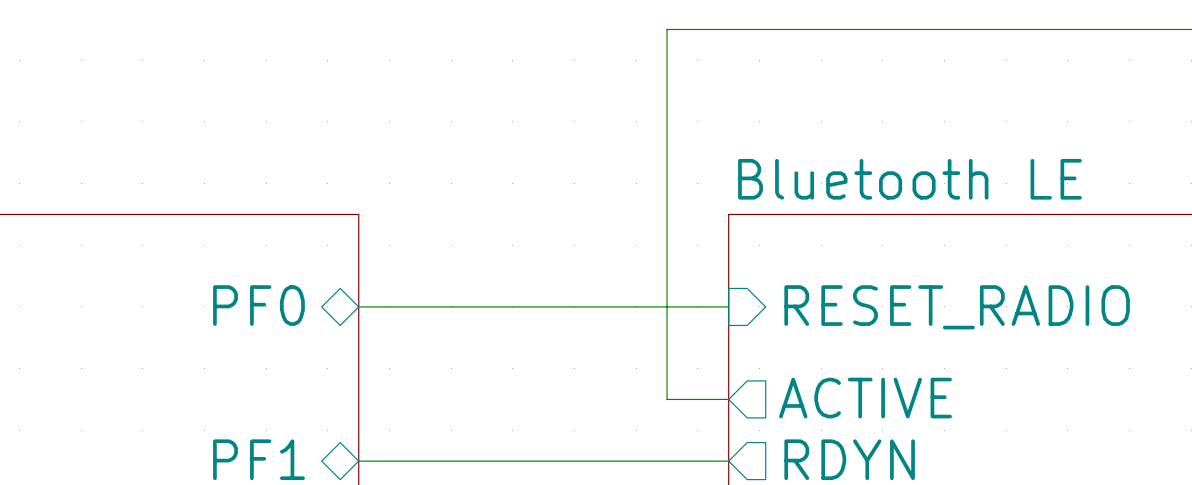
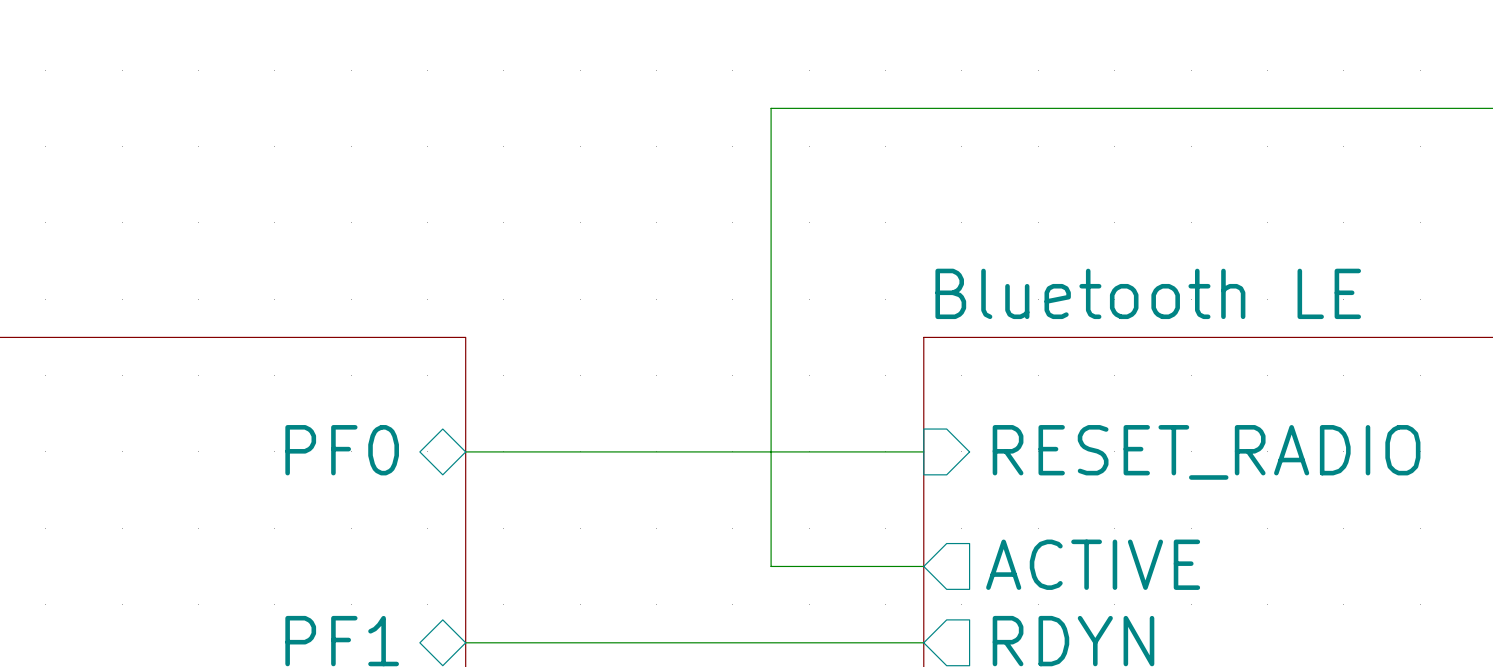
wire: (667, 29) (667, 399) -> (847, 108) (771, 108) (771, 566) (847, 566)

